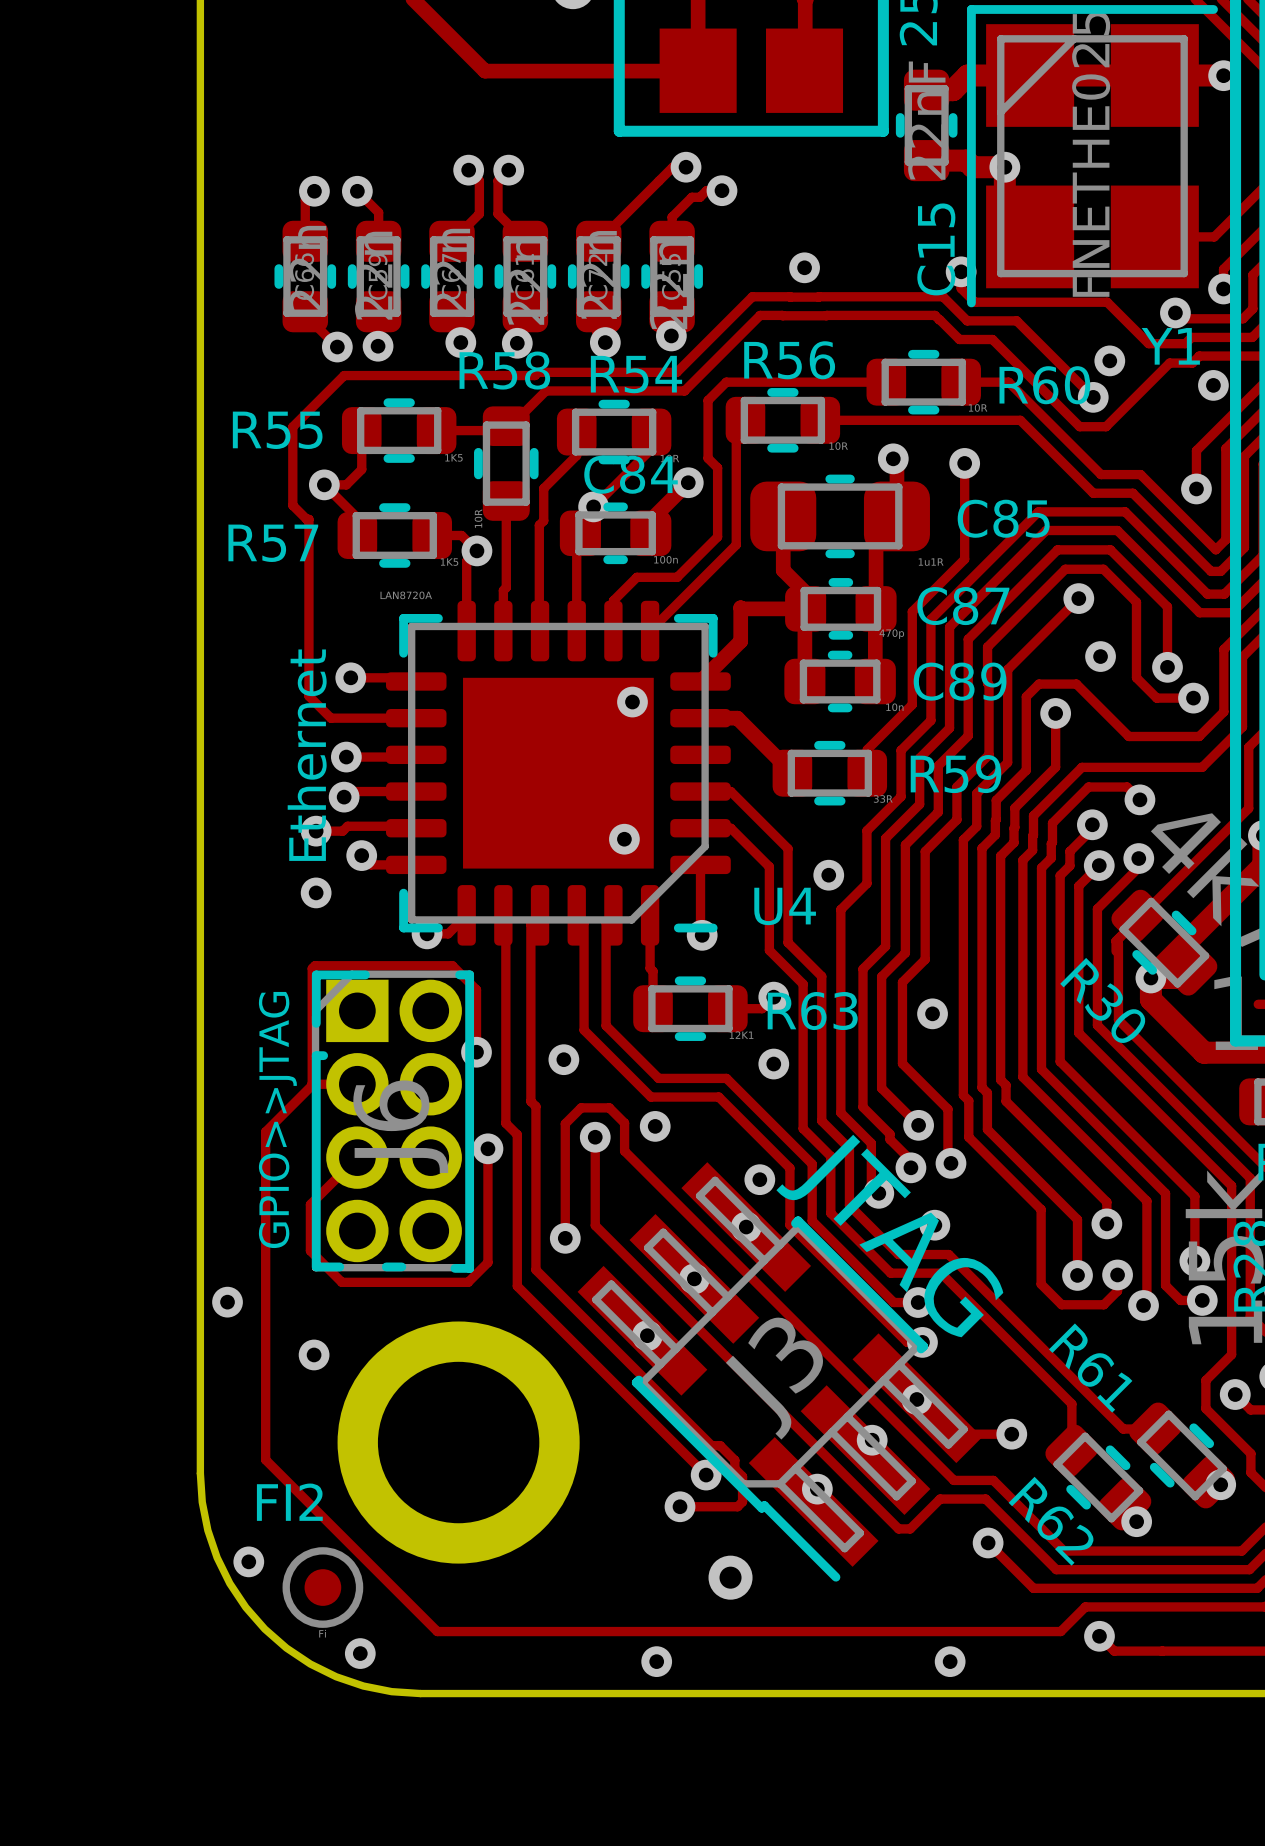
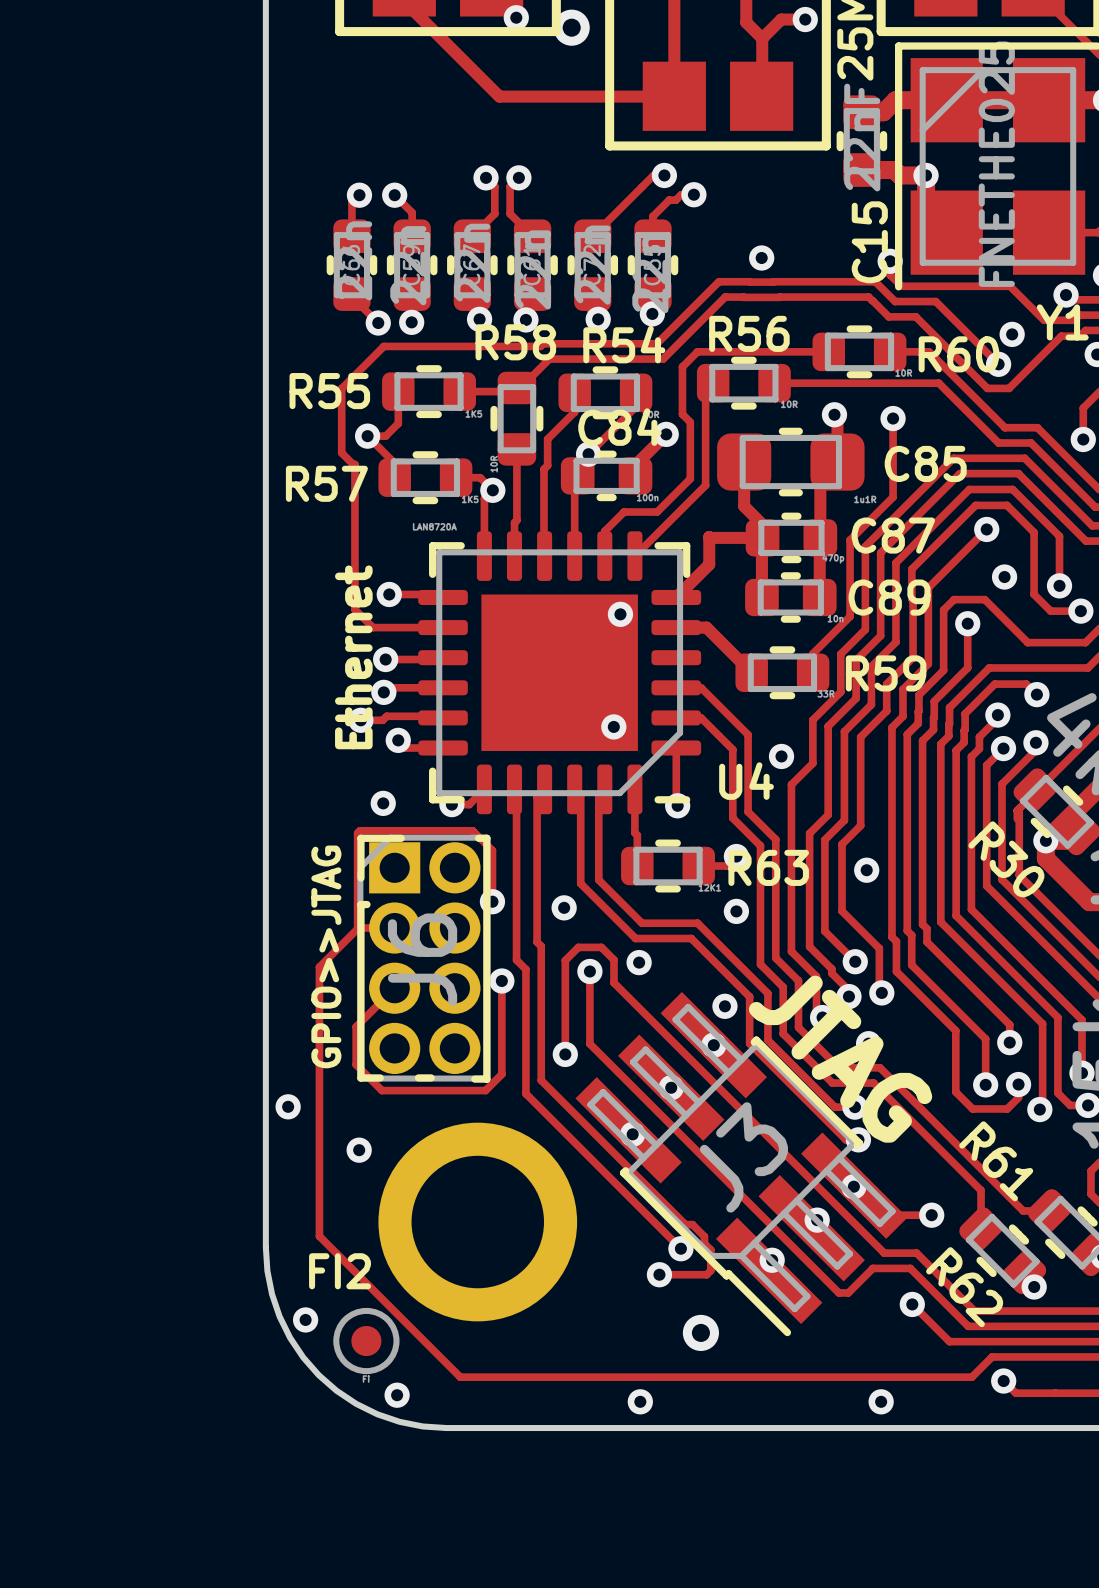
via position: (316, 892) -> (383, 803)

